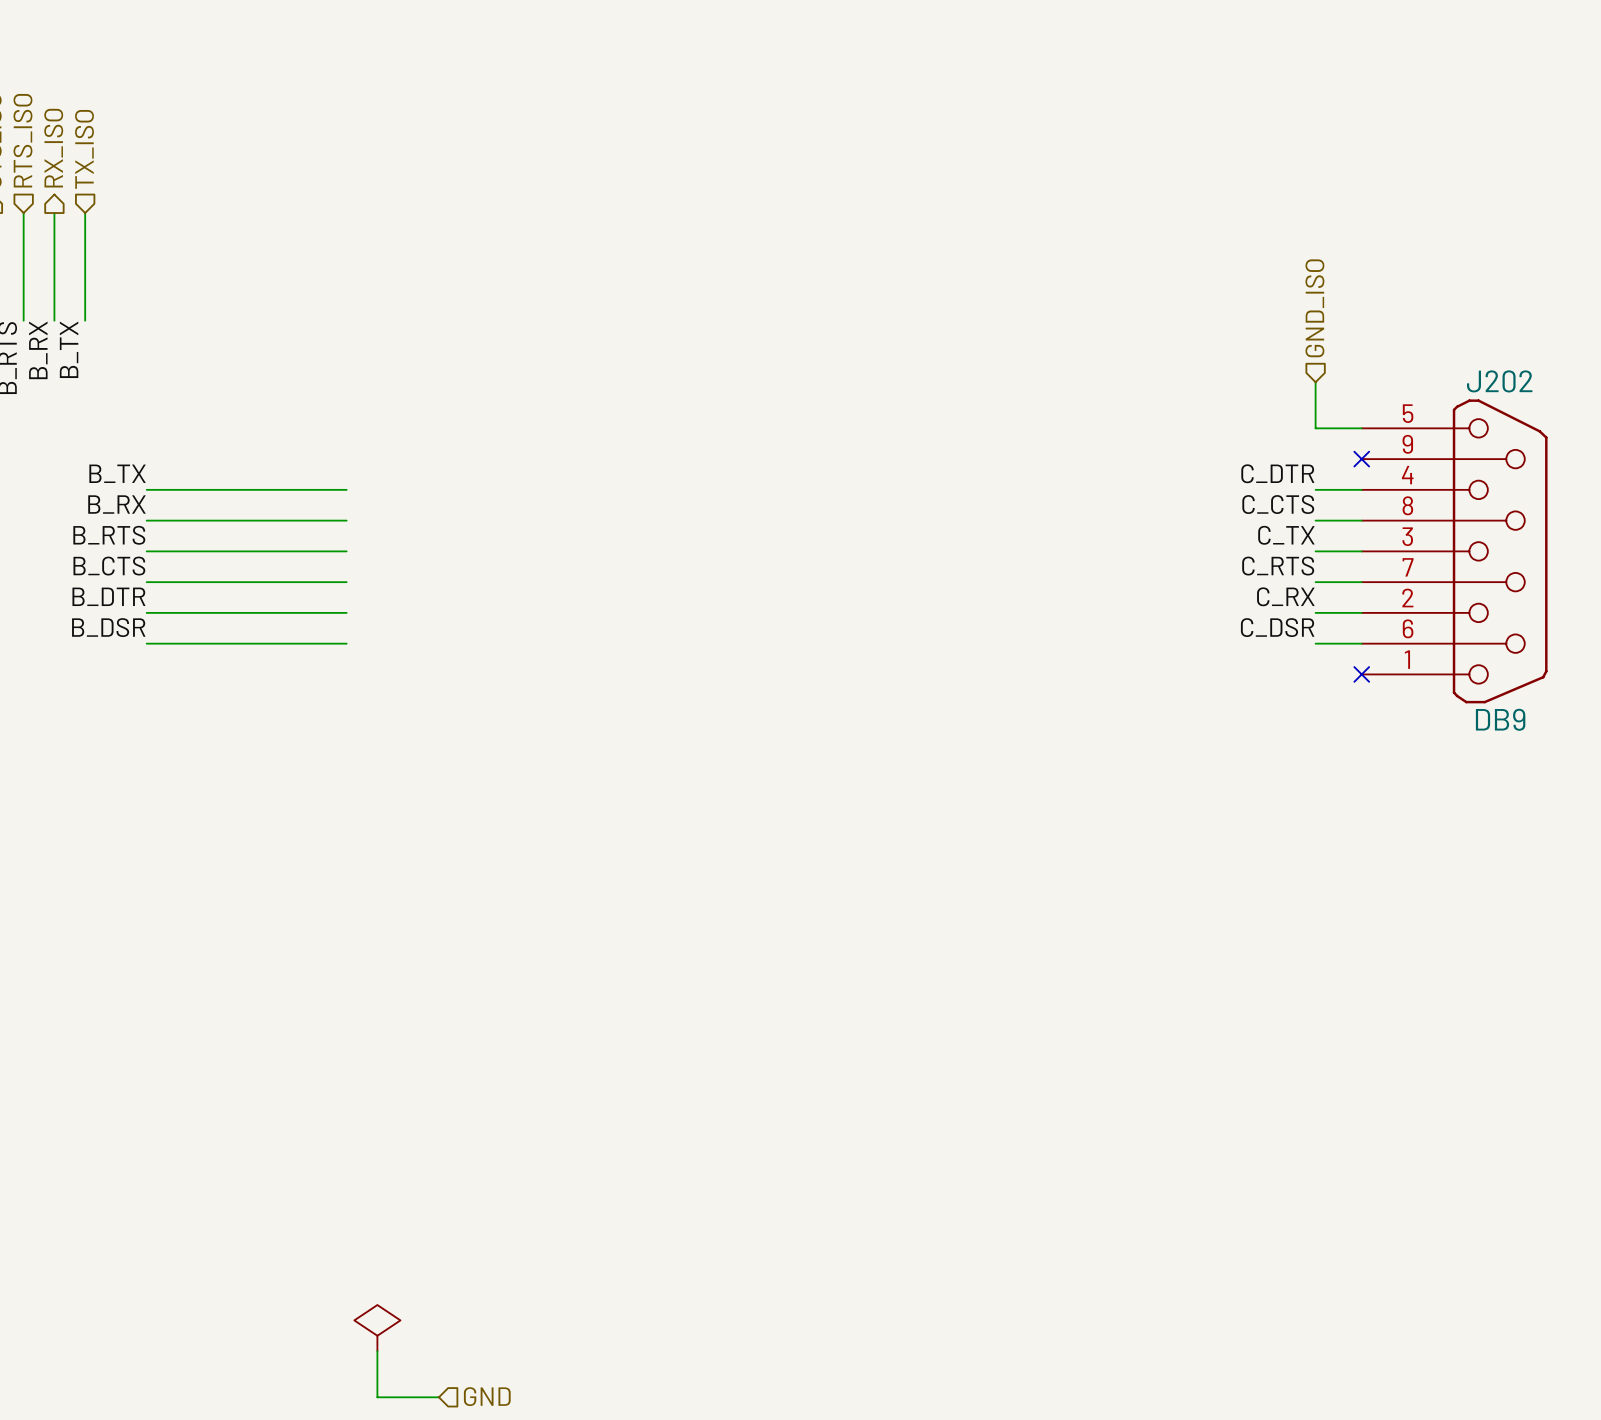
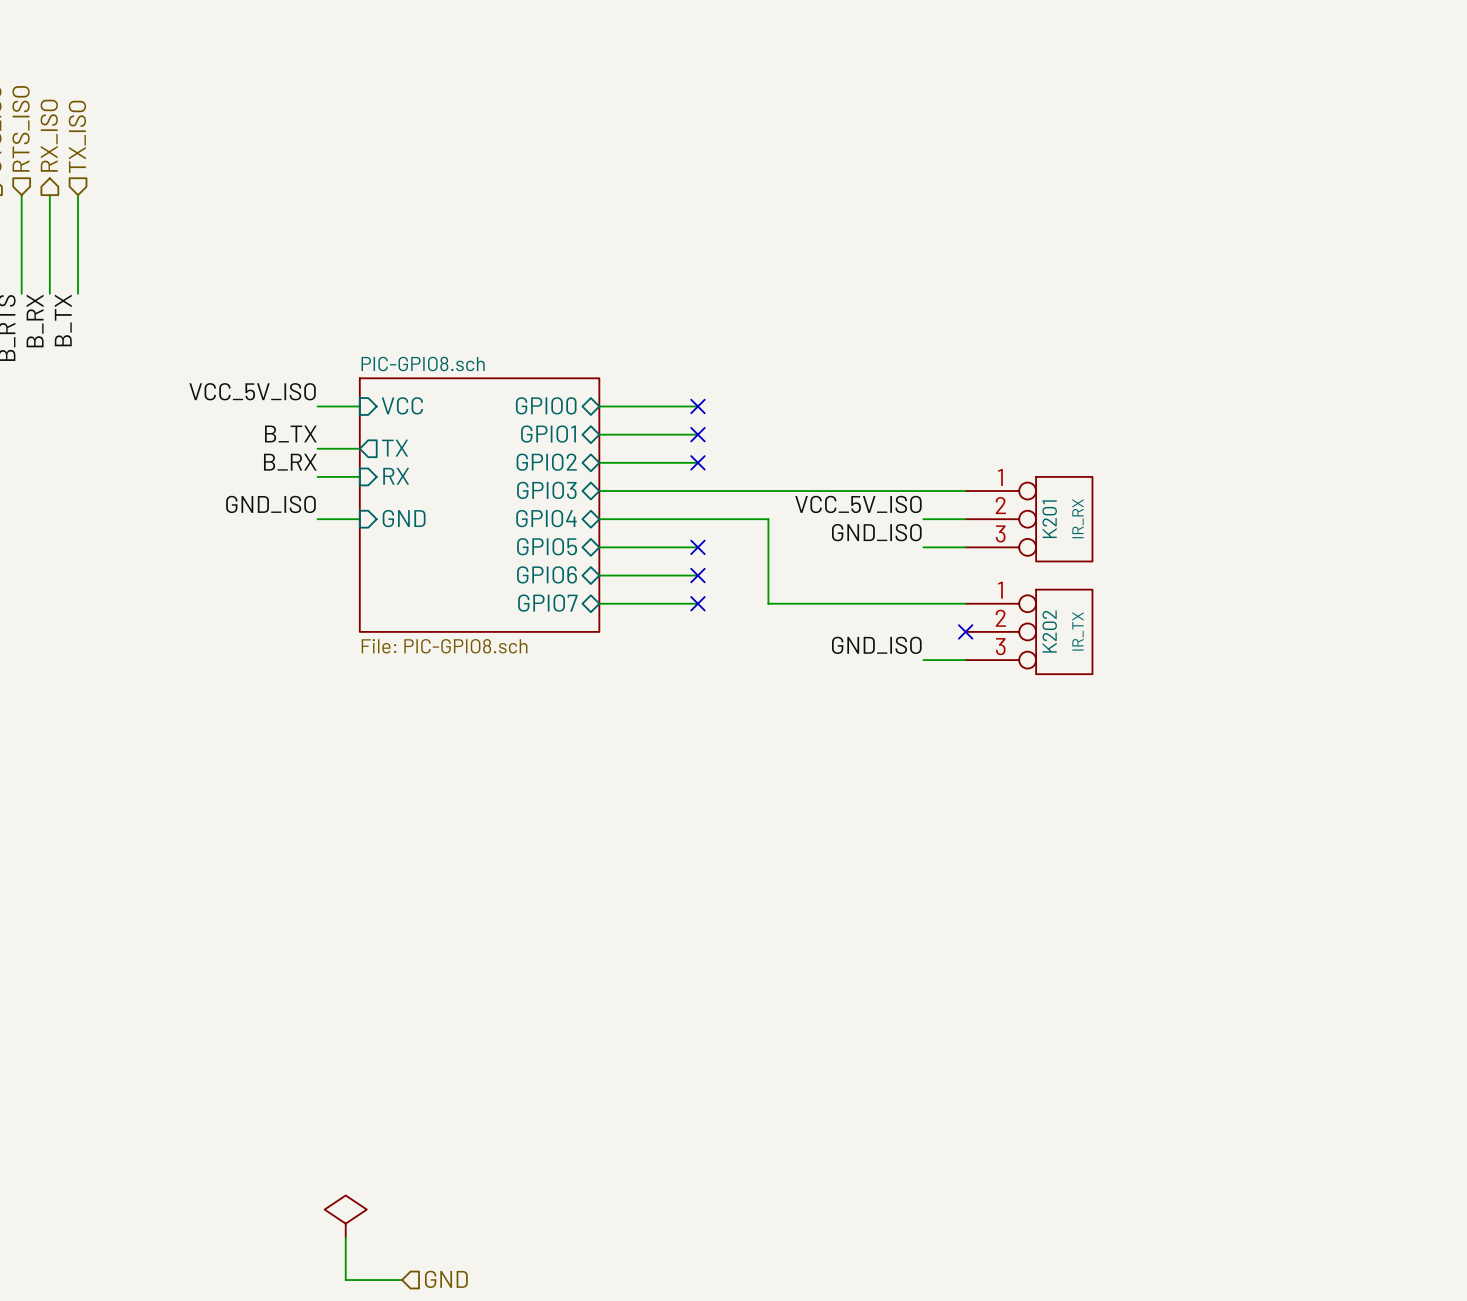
hierarchical label: GND_ISO (1314, 308) -> none
wire: (1315, 382) (1315, 428) (1361, 428) -> none
label: none -> VCC_5V_ISO (252, 391)
wire: none -> (317, 406) (359, 406)
sheet pin: none -> VCC (402, 405)
sheet pin: none -> GPIO0 (546, 405)
wire: none -> (599, 406) (697, 406)
no-connect mark: none -> (697, 406)
no-connect mark: (1361, 459) -> none
label position: B_TX (117, 473) -> B_TX (290, 434)
sheet pin: none -> GPIO1 (548, 434)
label: C_DTR (1277, 473) -> none
wire: none -> (599, 434) (697, 434)
no-connect mark: none -> (697, 434)
wire: (146, 489) (346, 489) -> (359, 448) (317, 448)
sheet pin: none -> TX (394, 448)
wire: (1315, 489) (1361, 489) -> none
label position: B_RX (116, 504) -> B_RX (290, 462)
sheet pin: none -> GPIO2 (546, 462)
label: C_CTS (1278, 504) -> none
wire: none -> (599, 462) (697, 462)
no-connect mark: none -> (697, 462)
sheet pin: none -> RX (396, 476)
wire: (146, 520) (346, 520) -> (359, 476) (317, 476)
wire: (1315, 520) (1361, 520) -> none
label: B_RTS (109, 535) -> none
sheet pin: none -> GPIO3 (546, 490)
label: C_TX (1286, 535) -> none
wire: none -> (599, 491) (965, 491)
label: none -> GND_ISO (270, 504)
label: none -> VCC_5V_ISO (858, 504)
wire: (146, 551) (346, 551) -> none
sheet PIC-GPIO8.sch: none -> File: PIC-GPIO8.sch (479, 505)
wire: (1315, 551) (1361, 551) -> none
J202: DB9 (1454, 551) -> none
label: B_CTS (109, 566) -> none
wire: none -> (317, 519) (359, 519)
sheet pin: none -> GND (404, 518)
sheet pin: none -> GPIO4 (546, 518)
wire: none -> (599, 519) (768, 519) (768, 603) (965, 603)
wire: none -> (923, 519) (965, 519)
K201: none -> IR_RX (1029, 519)
label: C_RTS (1278, 566) -> none
label: none -> GND_ISO (876, 532)
wire: (146, 582) (346, 582) -> none
wire: (1315, 582) (1361, 582) -> none
label: B_DTR (108, 596) -> none
sheet pin: none -> GPIO5 (547, 546)
label: C_RX (1285, 596) -> none
wire: none -> (599, 547) (697, 547)
no-connect mark: none -> (697, 547)
wire: none -> (923, 547) (965, 547)
wire: (146, 612) (346, 612) -> none
wire: (1315, 612) (1361, 612) -> none
label: B_DSR (108, 627) -> none
sheet pin: none -> GPIO6 (547, 574)
label: C_DSR (1277, 627) -> none
wire: none -> (599, 575) (697, 575)
no-connect mark: none -> (697, 575)
wire: (146, 643) (346, 643) -> none
wire: (1315, 643) (1361, 643) -> none
sheet pin: none -> GPIO7 (547, 603)
wire: none -> (599, 603) (697, 603)
no-connect mark: none -> (697, 603)
no-connect mark: (1361, 674) -> none
no-connect mark: none -> (965, 631)
K202: none -> IR_TX (1029, 631)
label: none -> GND_ISO (876, 645)
wire: none -> (923, 660) (965, 660)

